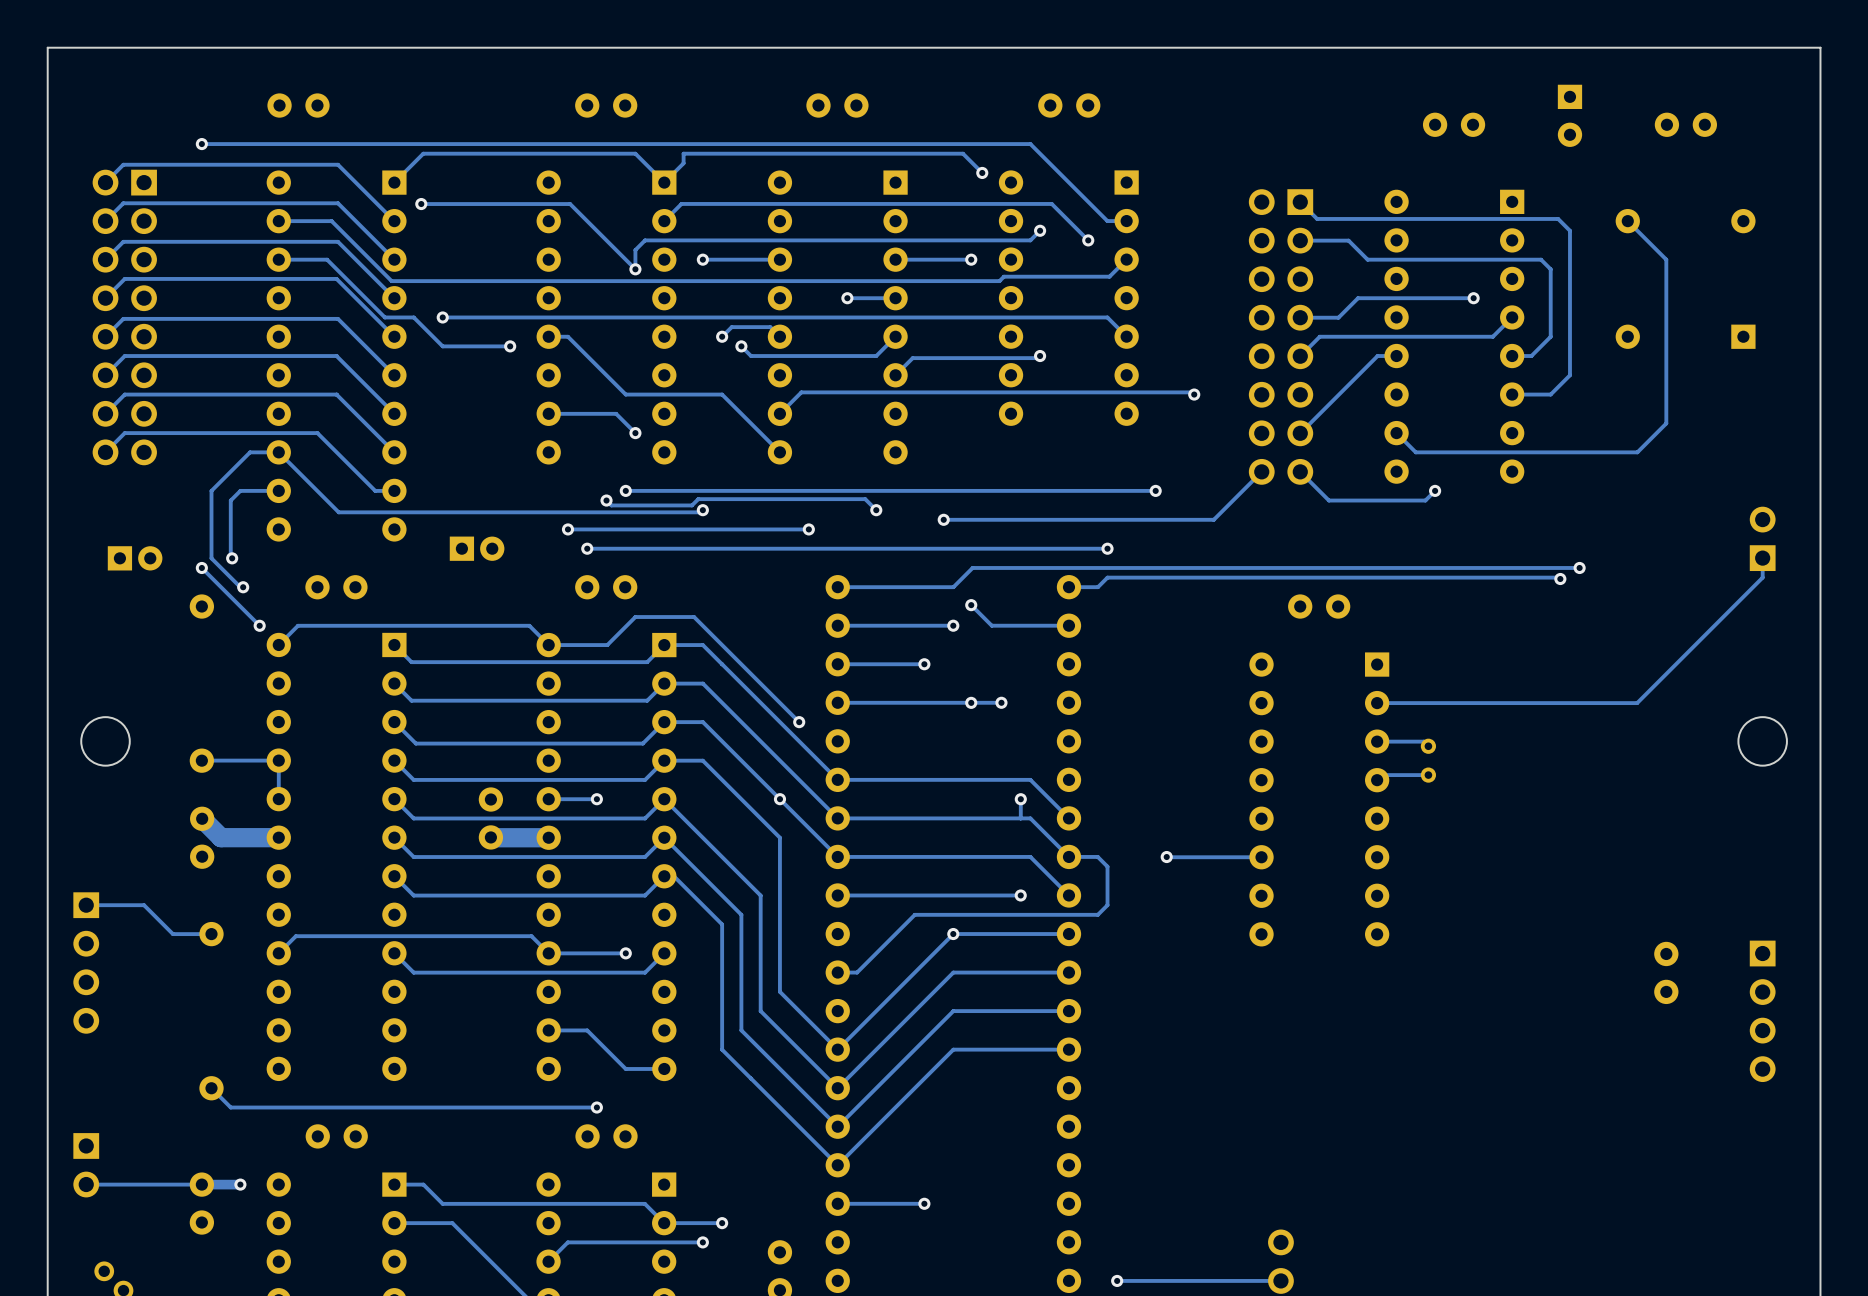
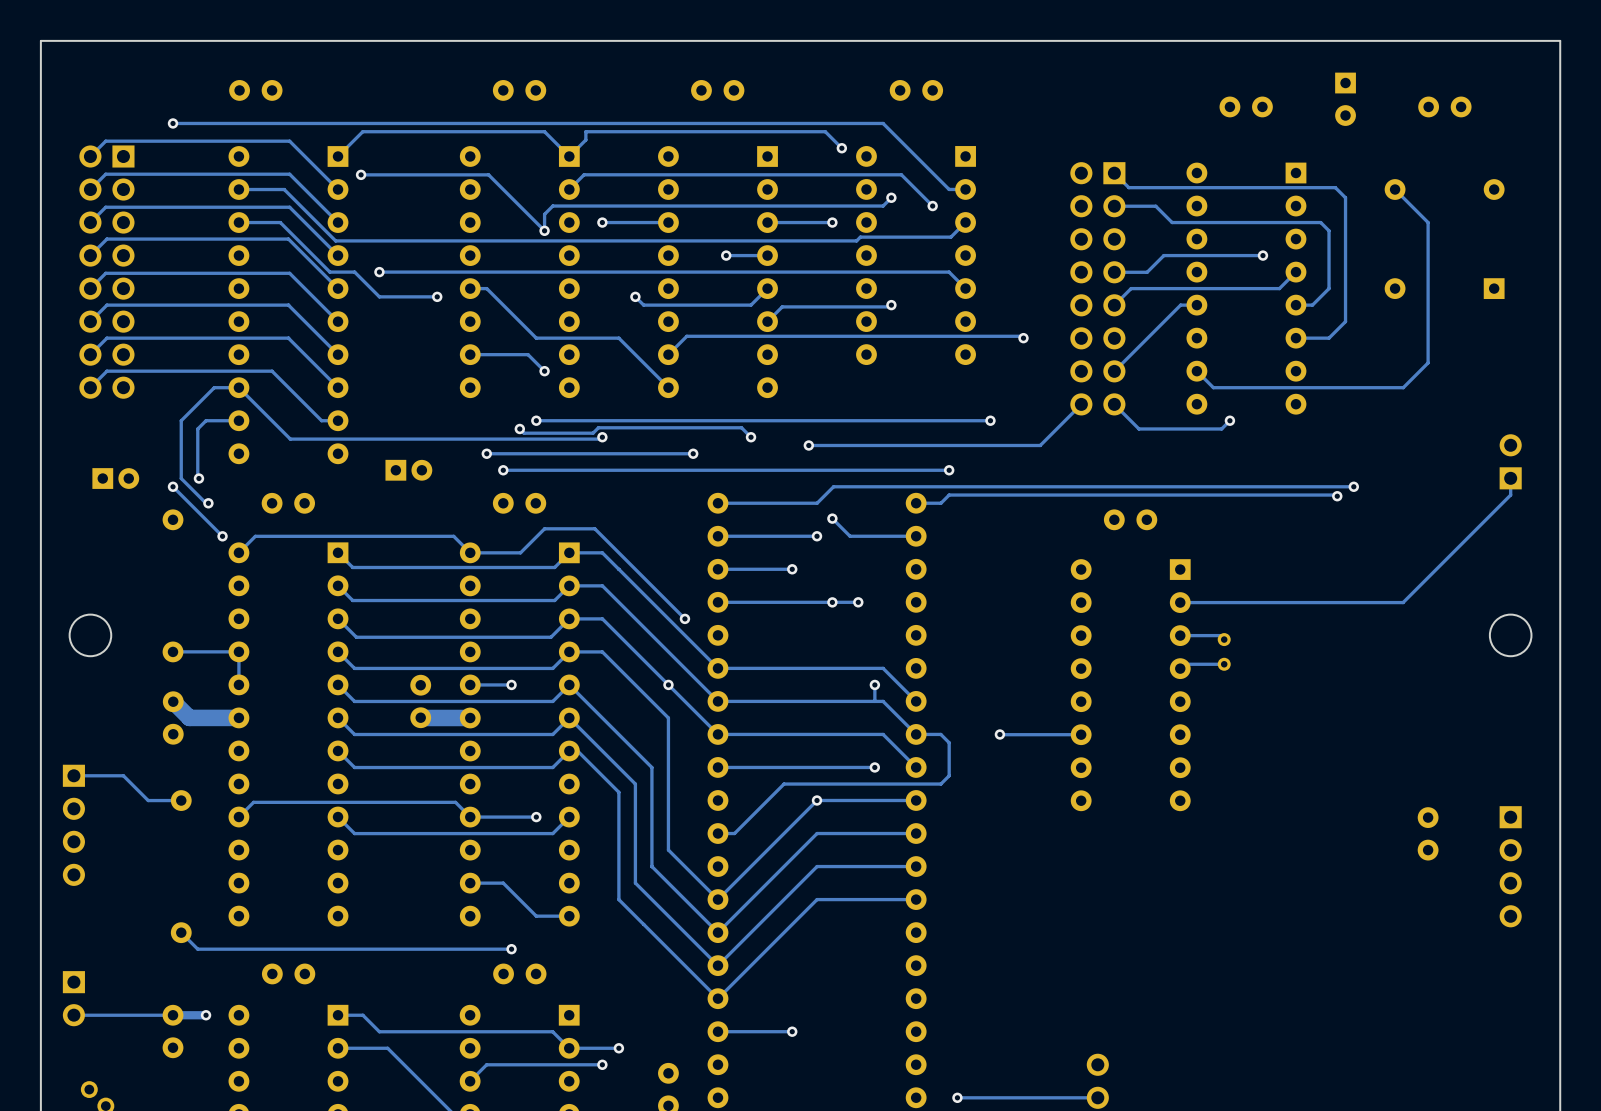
via: (722, 336) -> none
track: (779, 336) (770, 327) (731, 327) (722, 336) -> none

